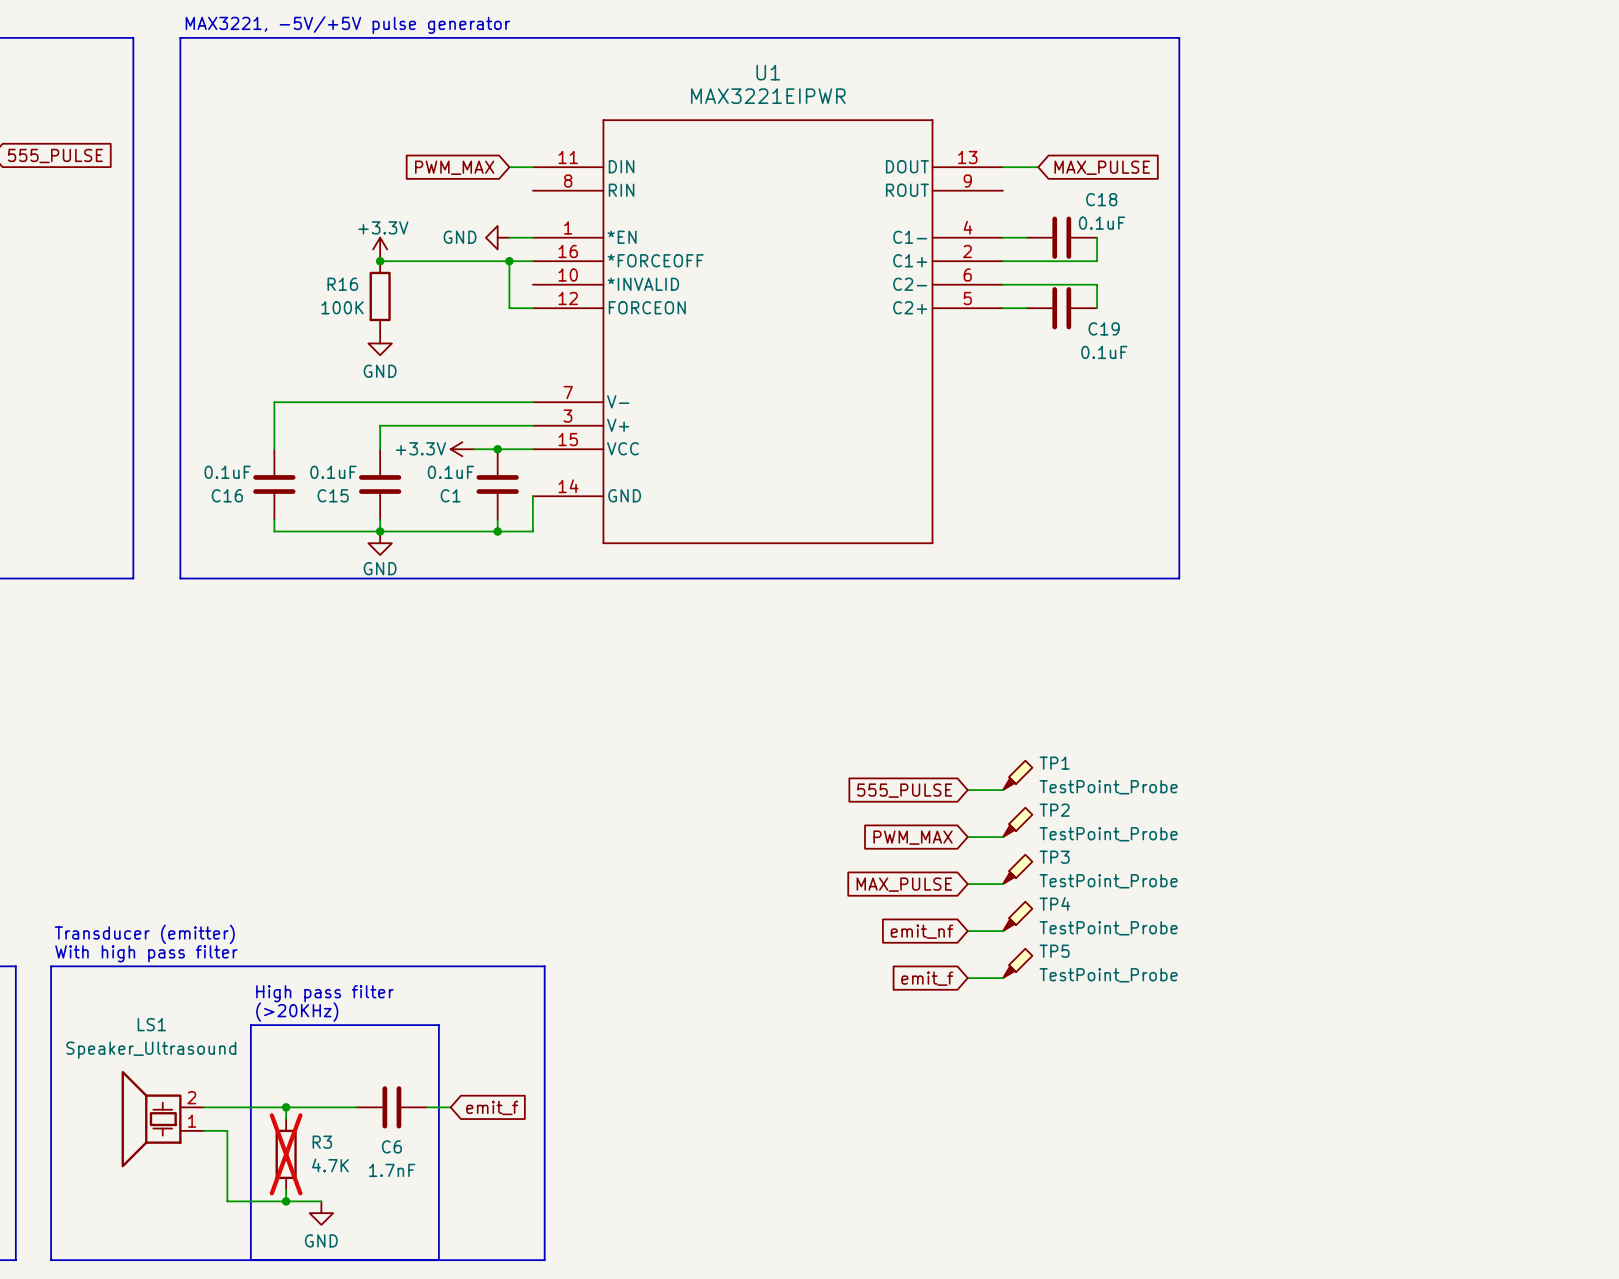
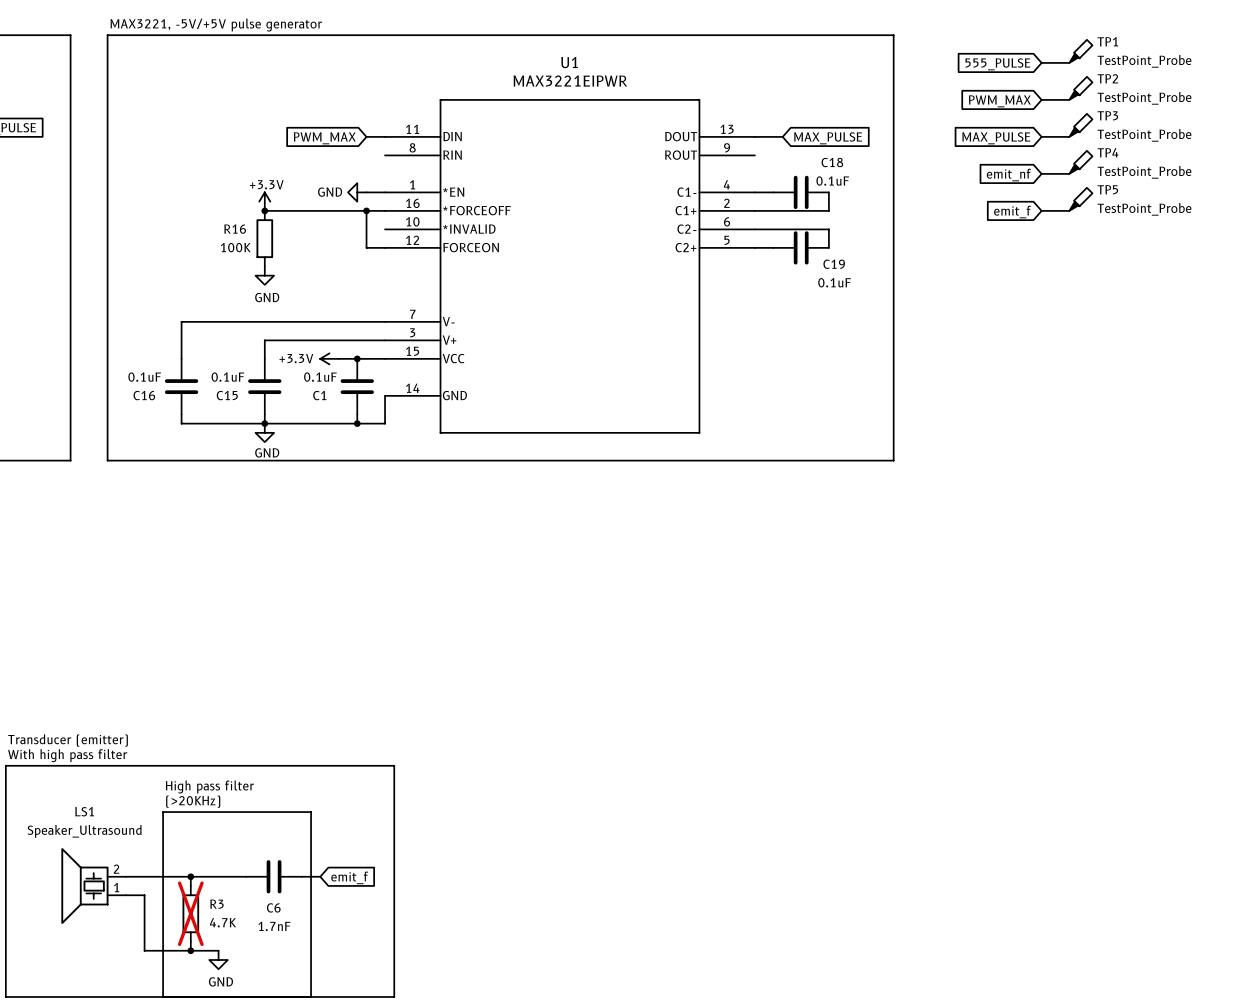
global label: none -> 555_PULSE (997, 64)
wire: none -> (1041, 62) (1069, 62)
global label: none -> PWM_MAX (999, 101)
wire: none -> (1041, 99) (1069, 99)
global label: none -> MAX_PULSE (996, 138)
wire: none -> (1041, 136) (1069, 136)
global label: none -> emit_nf (1008, 175)
wire: none -> (1041, 173) (1069, 173)
global label: none -> emit_f (1012, 212)
wire: none -> (1041, 210) (1069, 210)
TP1 position: (1017, 775) -> (1080, 51)
global label: 555_PULSE (904, 790) -> none
wire: (967, 790) (1003, 790) -> none
TP2 position: (1017, 822) -> (1080, 88)
global label: PWM_MAX (913, 837) -> none
wire: (967, 837) (1003, 837) -> none
TP3 position: (1017, 869) -> (1080, 125)
global label: MAX_PULSE (904, 884) -> none
wire: (967, 884) (1003, 884) -> none
TP4 position: (1017, 916) -> (1080, 162)
global label: emit_nf (922, 931) -> none
wire: (967, 931) (1003, 931) -> none
TP5 position: (1017, 963) -> (1080, 199)
global label: emit_f (927, 978) -> none
wire: (967, 978) (1003, 978) -> none

